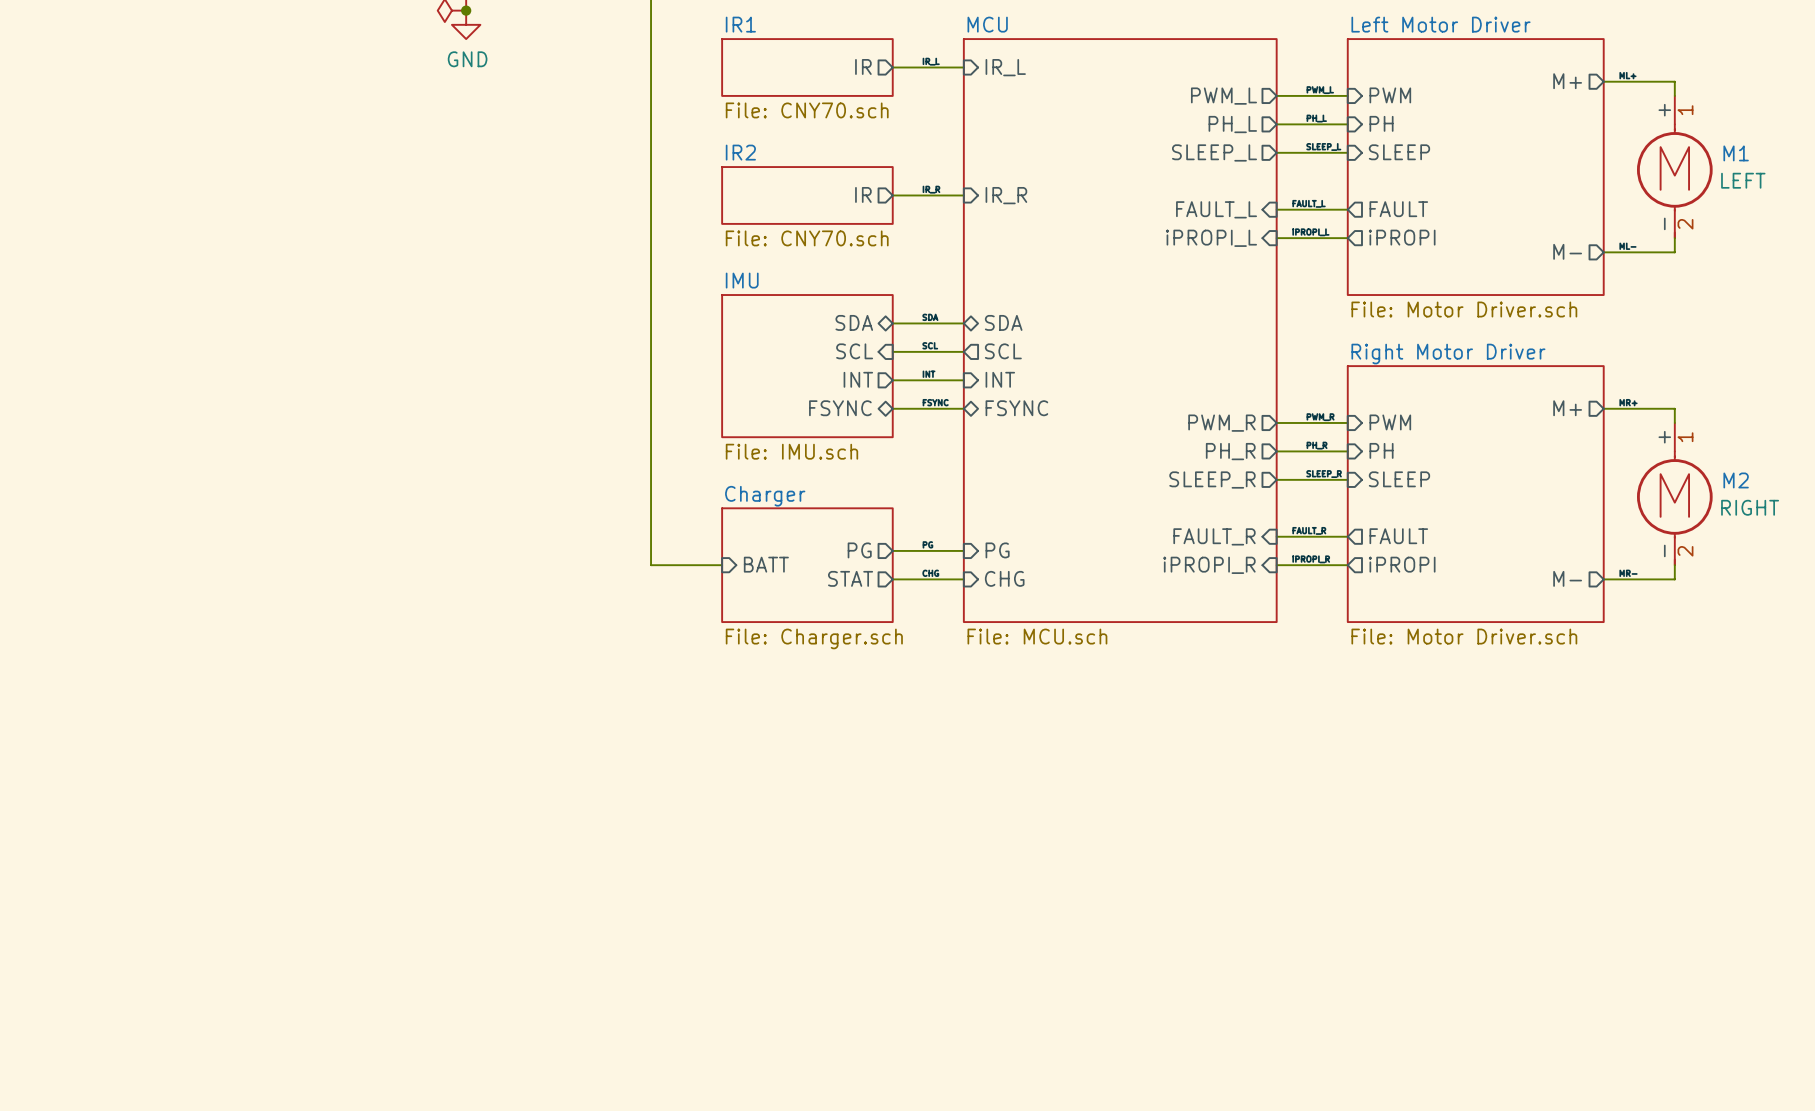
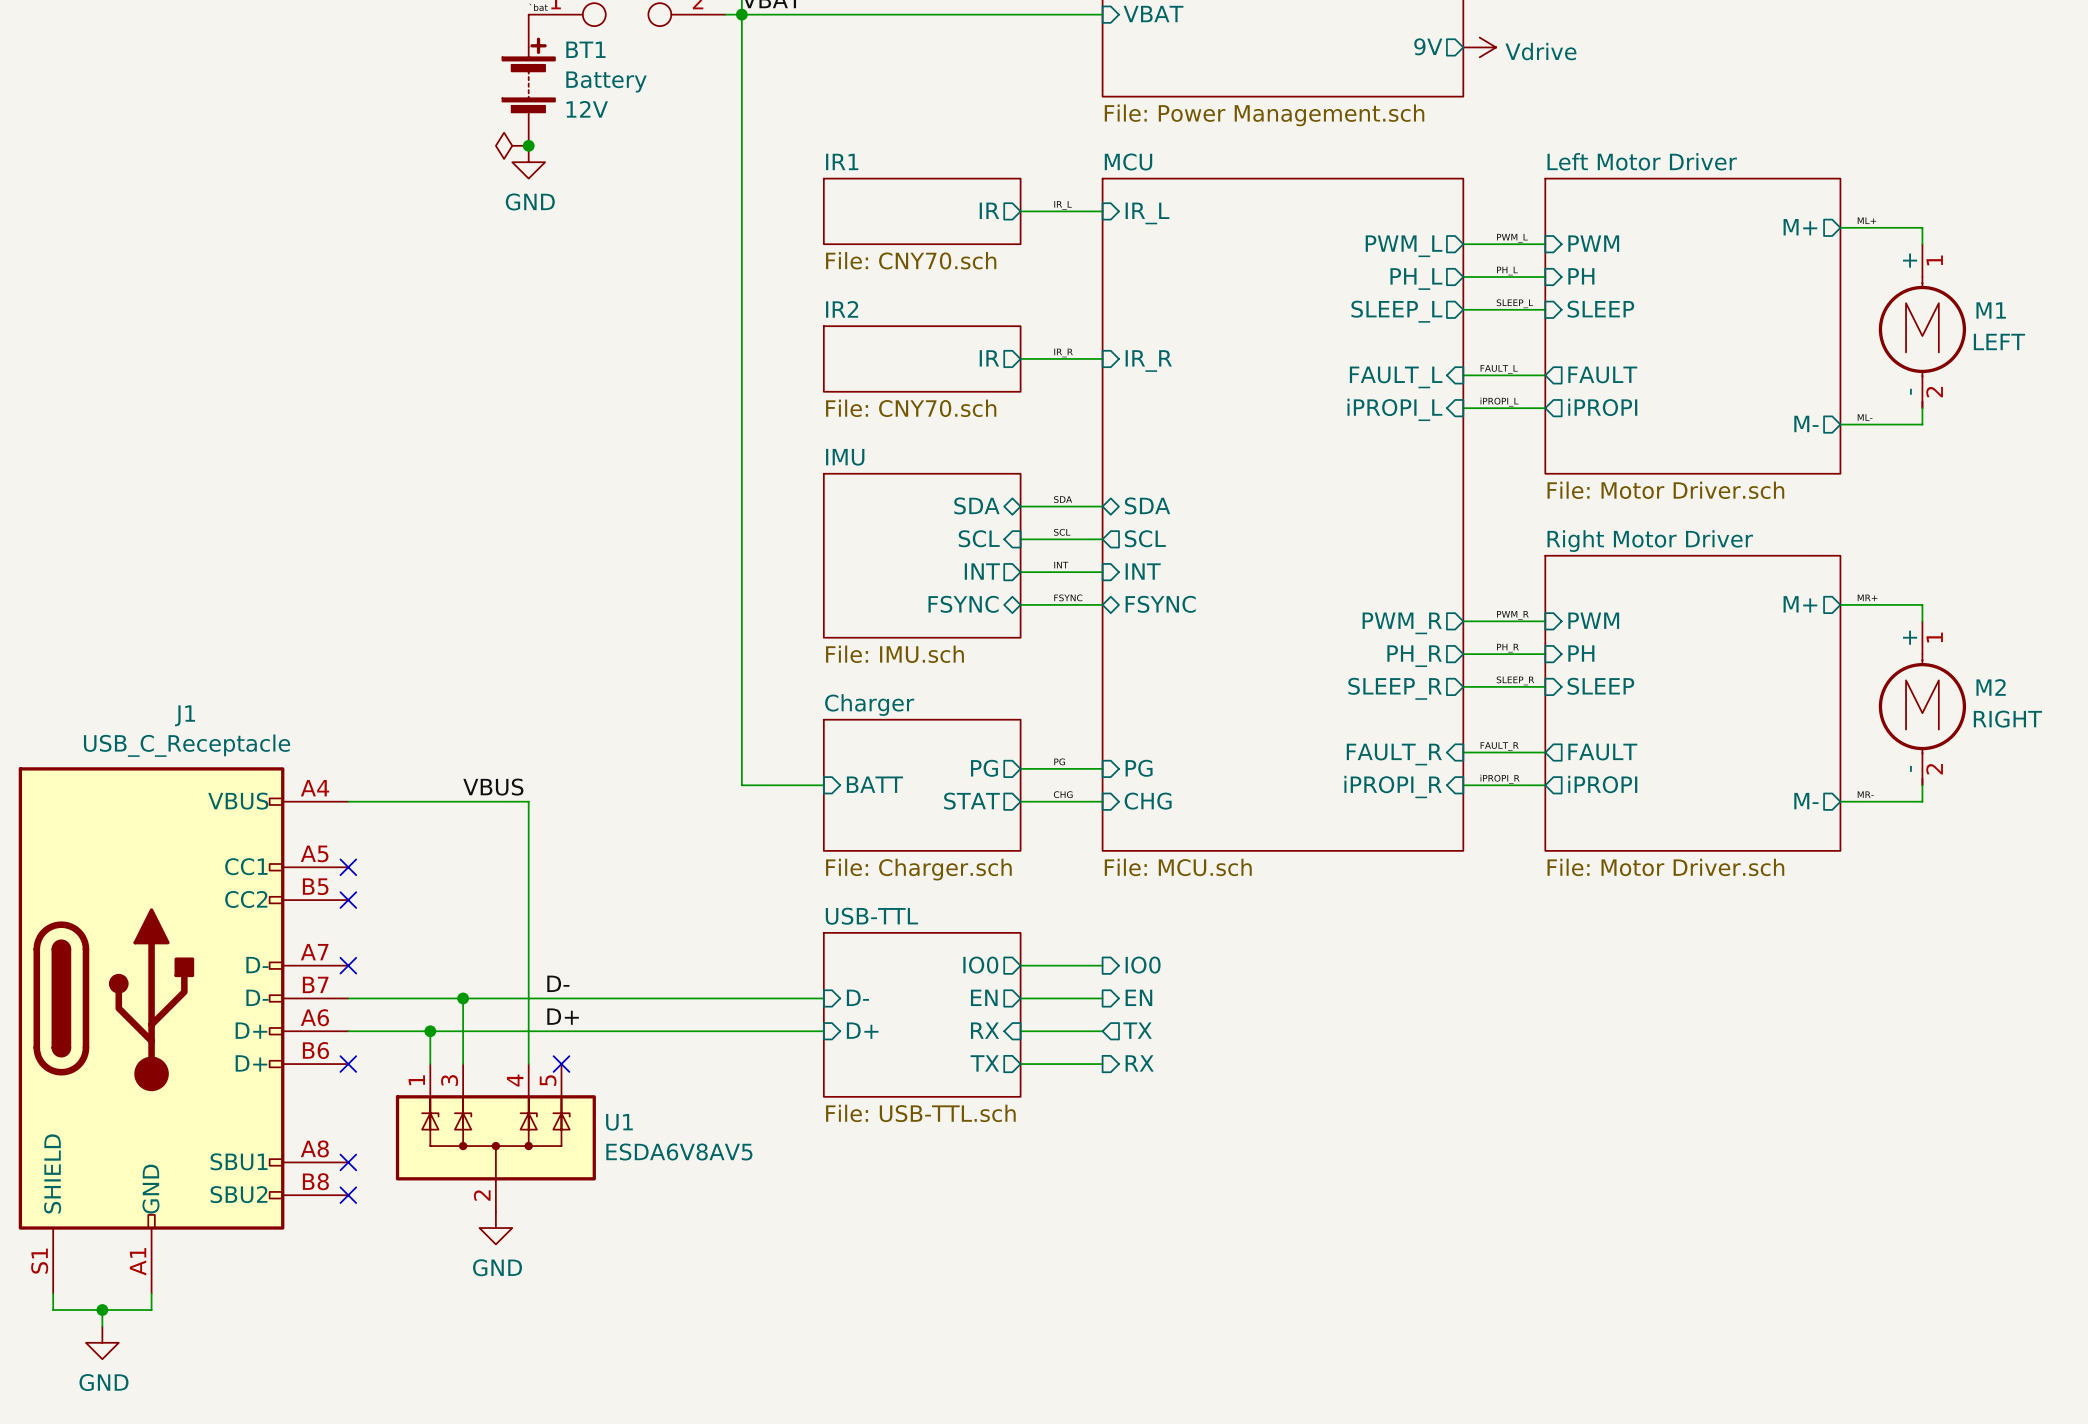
label: none -> VBUS (493, 787)
wire: none -> (348, 801) (528, 801) (528, 1064)
no-connect mark: none -> (348, 867)
no-connect mark: none -> (348, 900)
no-connect mark: none -> (348, 965)
sheet pin: none -> IO0 (980, 965)
wire: none -> (1020, 965) (1102, 965)
sheet pin: none -> IO0 (1143, 965)
label: none -> D- (558, 983)
sheet pin: none -> D- (857, 997)
sheet pin: none -> EN (984, 997)
sheet pin: none -> EN (1138, 997)
wire: none -> (348, 998) (823, 998)
wire: none -> (463, 998) (463, 1064)
junction: none -> (463, 998)
wire: none -> (1020, 998) (1102, 998)
sheet USB-TTL: none -> File: USB-TTL.sch (922, 1014)
label: none -> D+ (563, 1016)
J1: none -> USB_C_Receptacle (183, 1030)
sheet pin: none -> D+ (862, 1030)
sheet pin: none -> RX (985, 1030)
sheet pin: none -> TX (1137, 1030)
wire: none -> (348, 1031) (823, 1031)
wire: none -> (430, 1031) (430, 1064)
junction: none -> (430, 1031)
wire: none -> (1020, 1031) (1102, 1031)
no-connect mark: none -> (348, 1064)
no-connect mark: none -> (561, 1064)
sheet pin: none -> TX (984, 1063)
wire: none -> (1020, 1064) (1102, 1064)
sheet pin: none -> RX (1139, 1063)
U1: none -> ESDA6V8AV5 (495, 1137)
no-connect mark: none -> (348, 1162)
no-connect mark: none -> (348, 1195)
power symbol: none -> GND (495, 1228)
wire: none -> (53, 1293) (53, 1310) (151, 1310) (151, 1293)
wire: none -> (102, 1310) (102, 1326)
junction: none -> (102, 1310)
power symbol: none -> GND (102, 1342)

